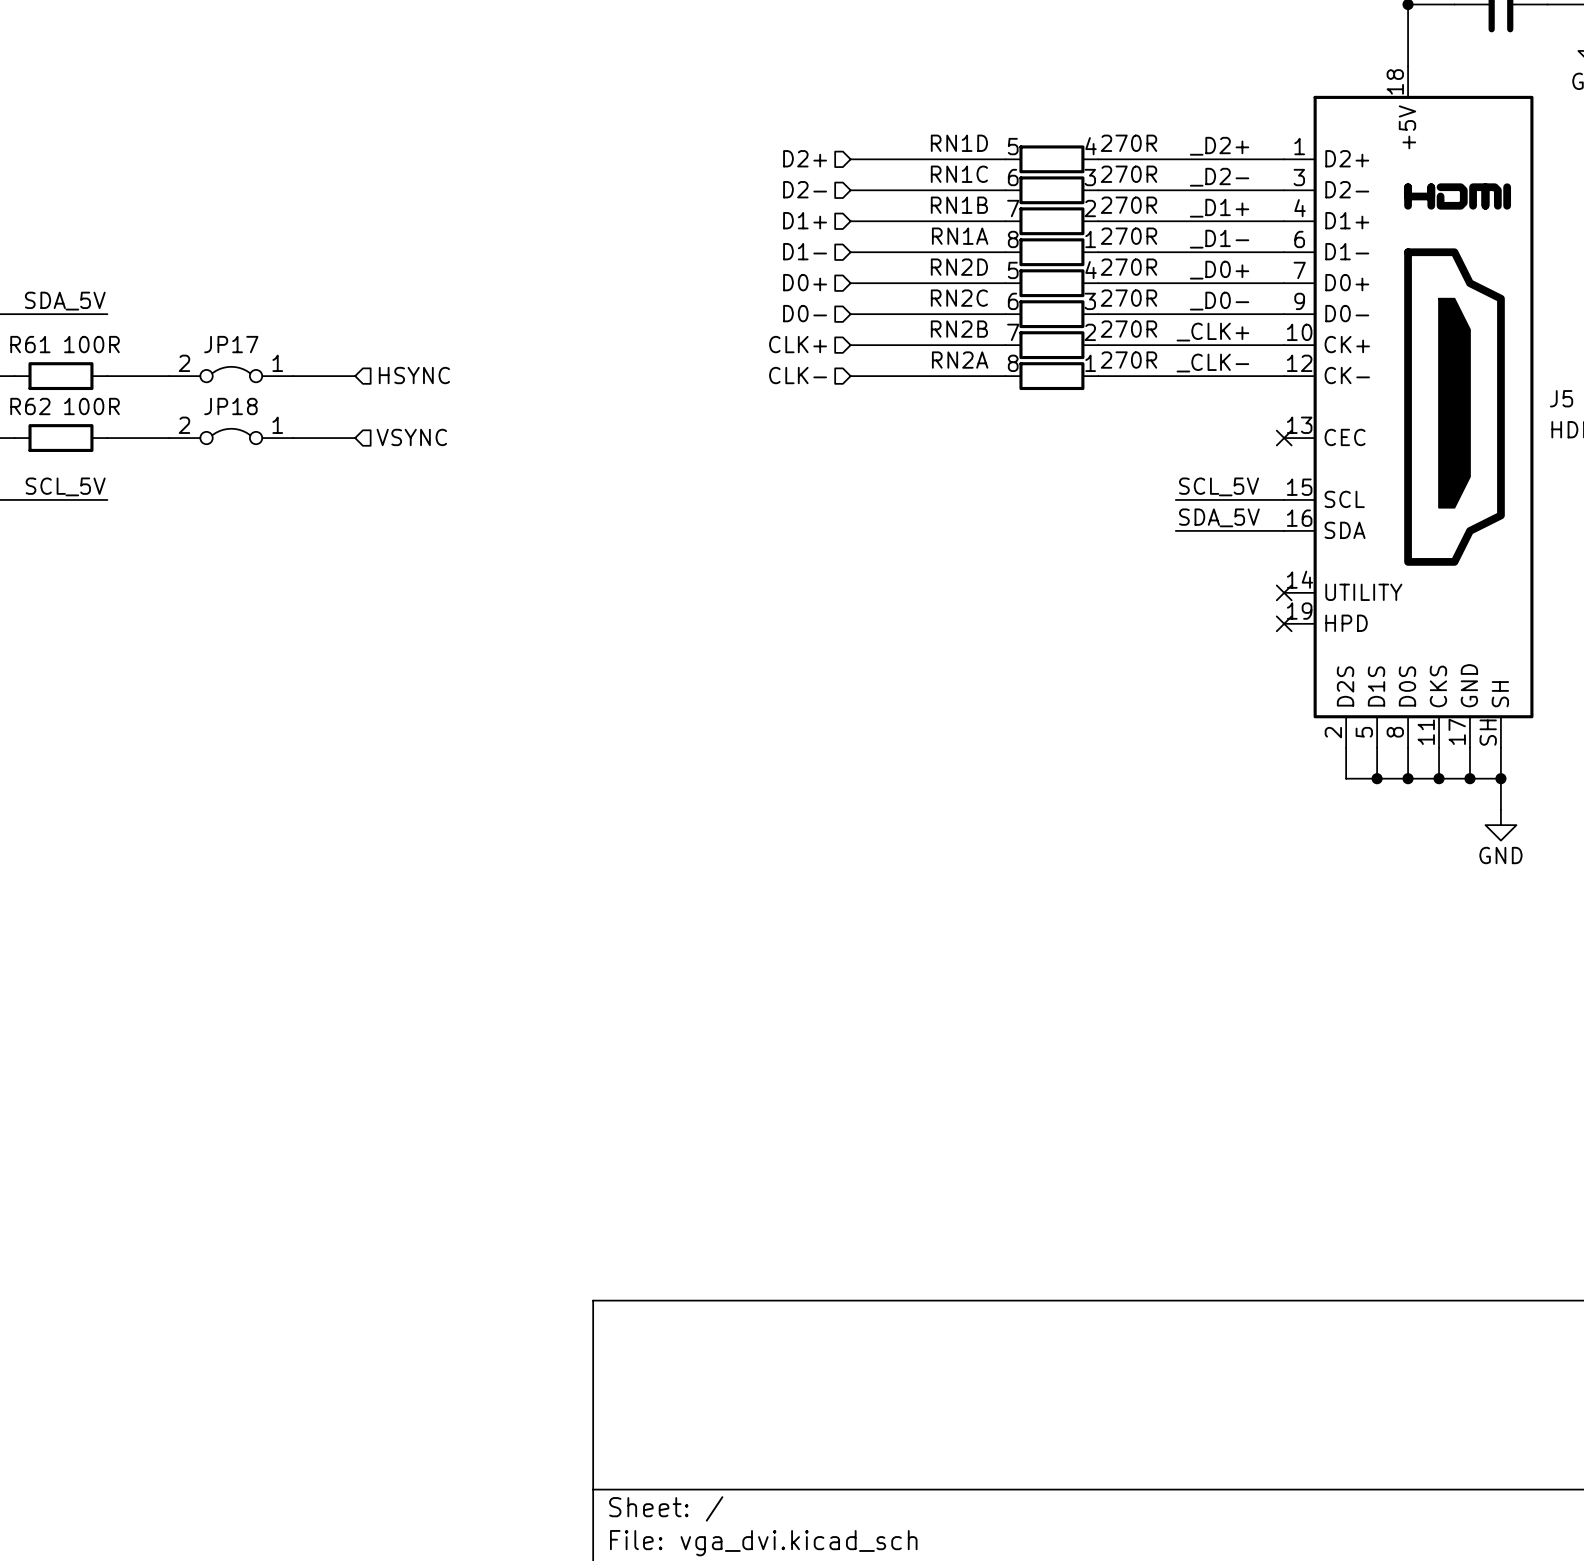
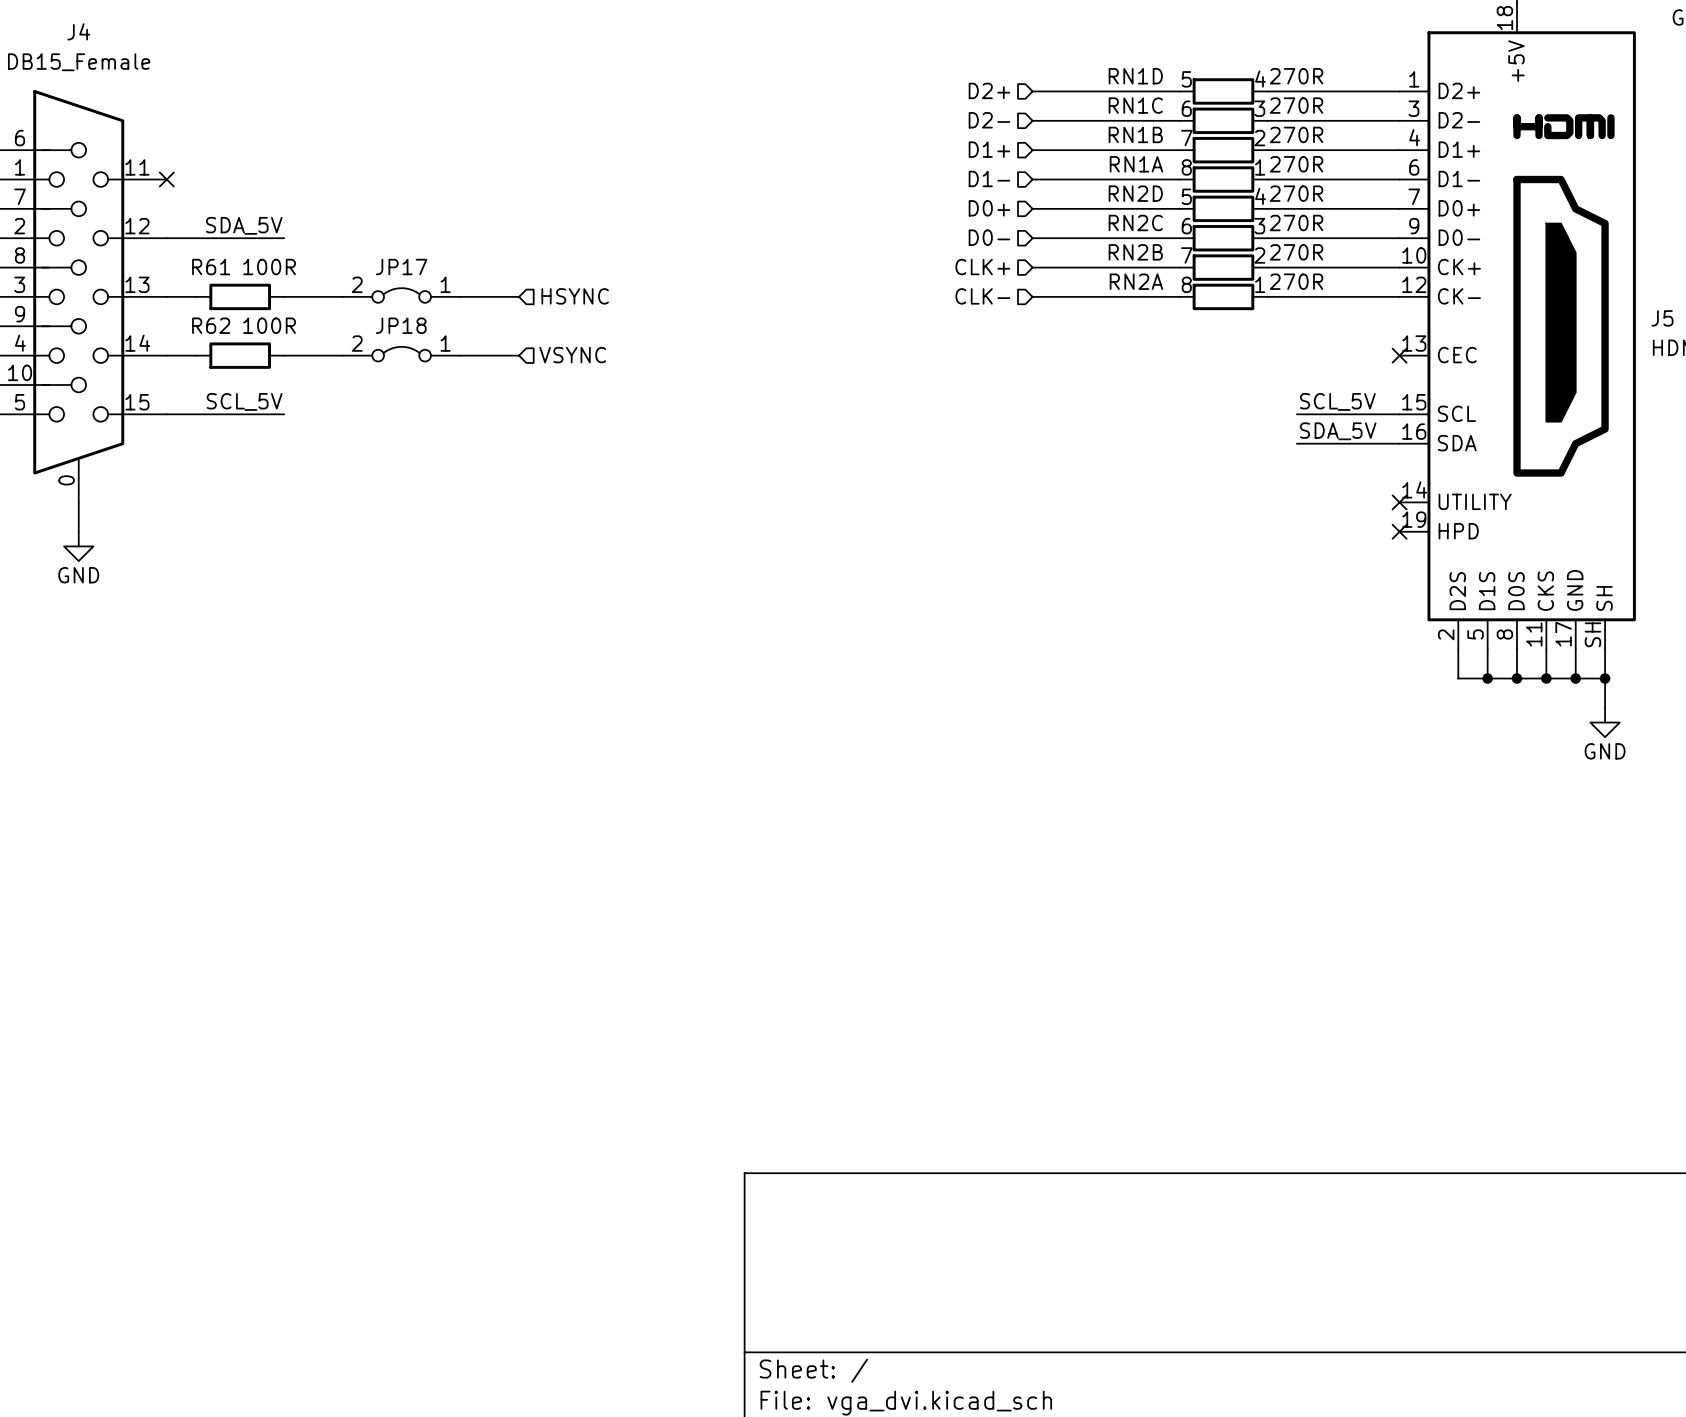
label: _D2+ (1219, 146) -> none
hierarchical label position: D2+ (805, 158) -> D2+ (989, 90)
wire: (850, 159) (897, 159) -> none
RN1D position: (1051, 159) -> (1223, 91)
wire: (1098, 159) (1144, 159) -> (1135, 91) (1179, 91)
label: _D2- (1219, 177) -> none
hierarchical label position: D2- (805, 189) -> D2- (989, 120)
wire: (850, 190) (897, 190) -> none
RN1C position: (1051, 190) -> (1223, 120)
wire: (1098, 190) (1144, 190) -> (1135, 120) (1179, 120)
label: _D1+ (1219, 208) -> none
hierarchical label position: D1+ (805, 220) -> D1+ (989, 149)
wire: (850, 221) (897, 221) -> none
RN1B position: (1051, 221) -> (1223, 150)
wire: (1098, 221) (1144, 221) -> (1135, 150) (1179, 150)
label: _D1- (1219, 239) -> none
hierarchical label position: D1- (805, 251) -> D1- (989, 178)
wire: (850, 252) (897, 252) -> none
RN1A position: (1051, 252) -> (1223, 179)
wire: (1098, 252) (1144, 252) -> (1135, 179) (1179, 179)
label: _D0+ (1219, 270) -> none
hierarchical label position: D0+ (805, 282) -> D0+ (989, 208)
wire: (850, 283) (897, 283) -> none
RN2D position: (1051, 283) -> (1223, 208)
wire: (1098, 283) (1144, 283) -> (1135, 208) (1179, 208)
label: _D0- (1219, 301) -> none
hierarchical label position: D0- (805, 313) -> D0- (989, 237)
wire: (850, 314) (897, 314) -> none
RN2C position: (1051, 314) -> (1223, 238)
wire: (1098, 314) (1144, 314) -> (1135, 238) (1179, 238)
label: _CLK+ (1212, 332) -> none
hierarchical label position: CLK+ (798, 344) -> CLK+ (982, 267)
wire: (850, 345) (897, 345) -> none
RN2B position: (1051, 345) -> (1223, 267)
wire: (1098, 345) (1144, 345) -> (1135, 267) (1179, 267)
label: _CLK- (1212, 363) -> none
hierarchical label position: CLK- (798, 375) -> CLK- (982, 296)
wire: (850, 376) (897, 376) -> none
RN2A position: (1051, 376) -> (1223, 296)
wire: (1098, 376) (1144, 376) -> (1135, 296) (1179, 296)

